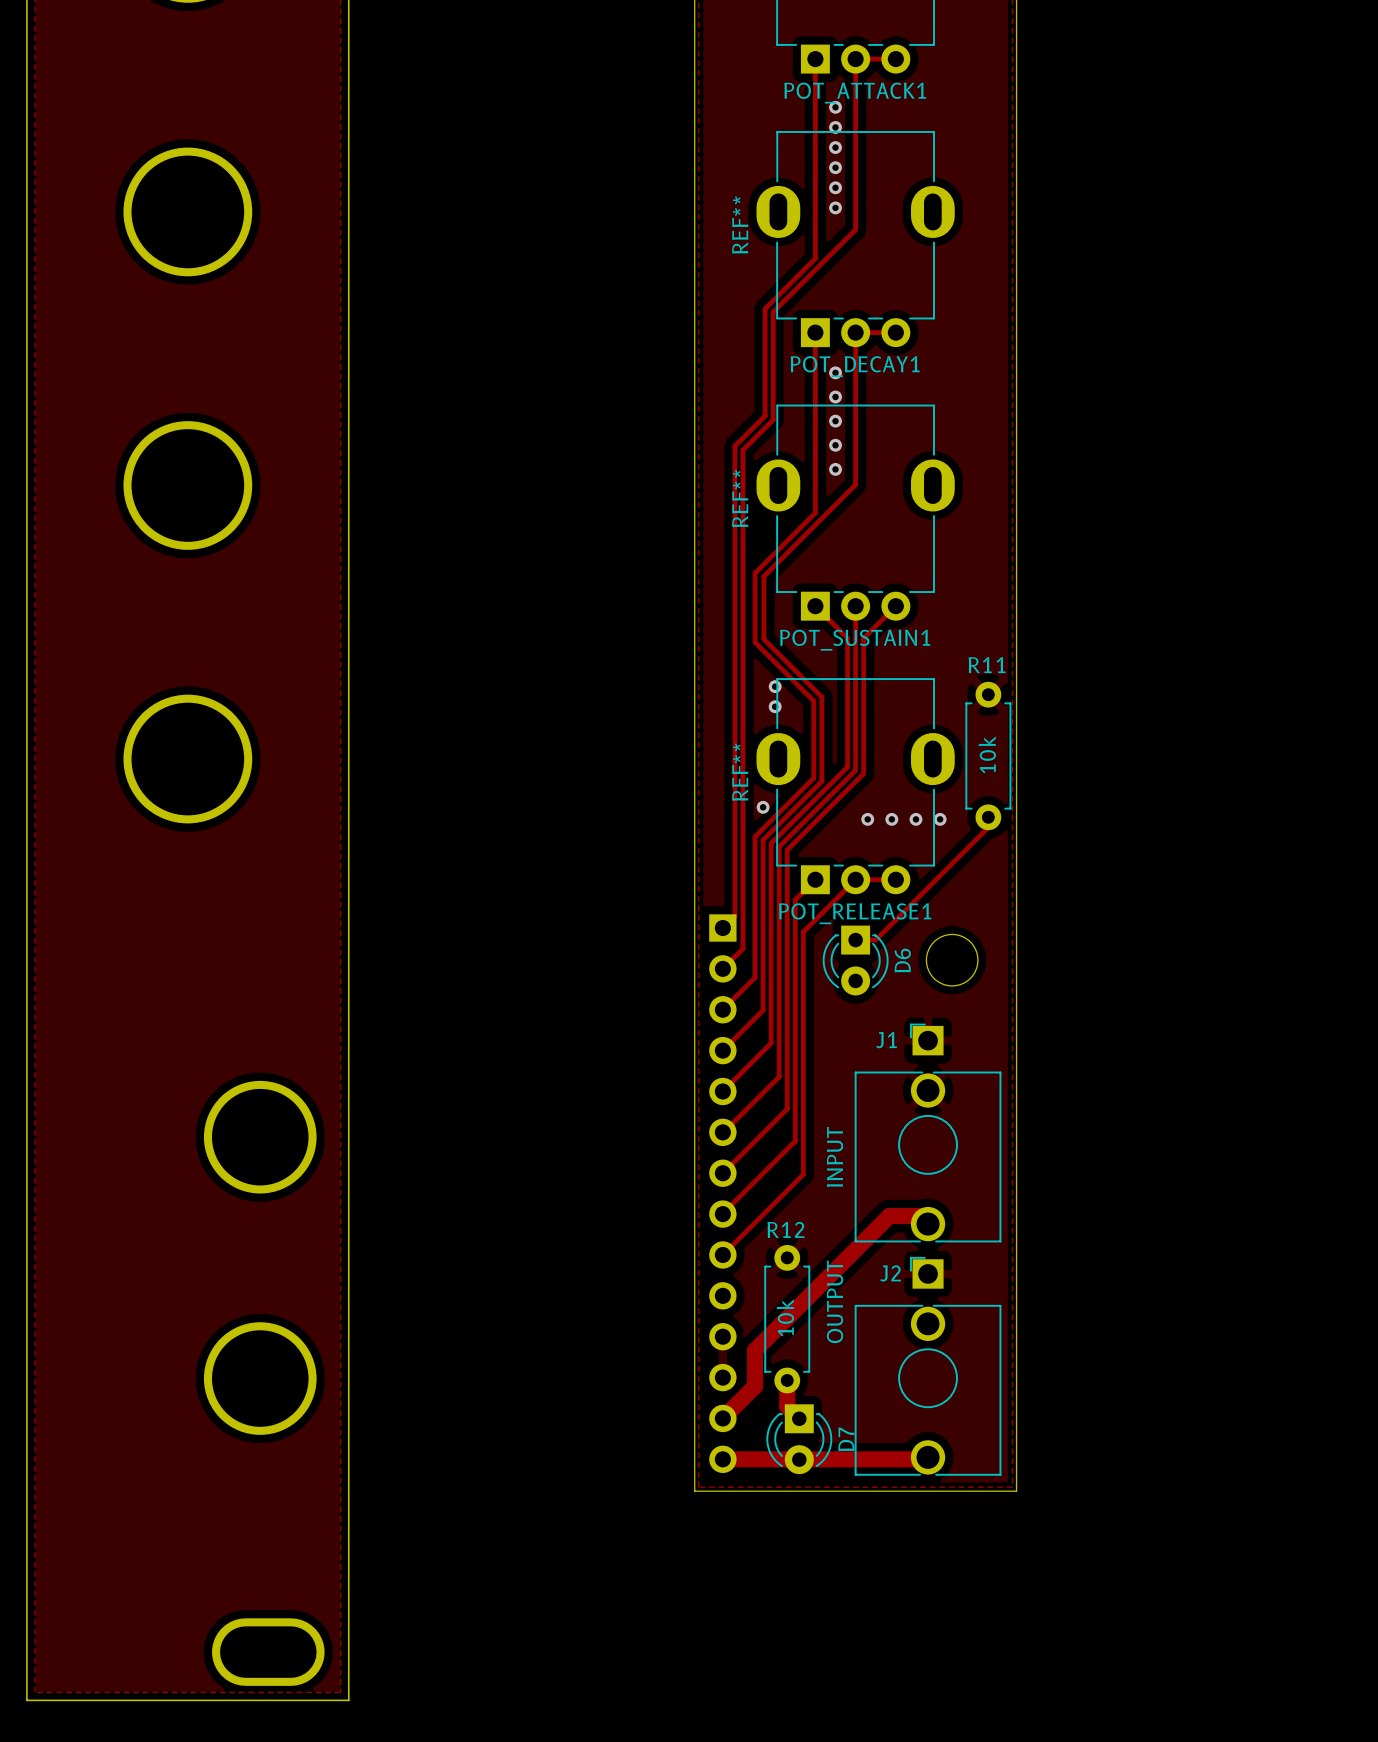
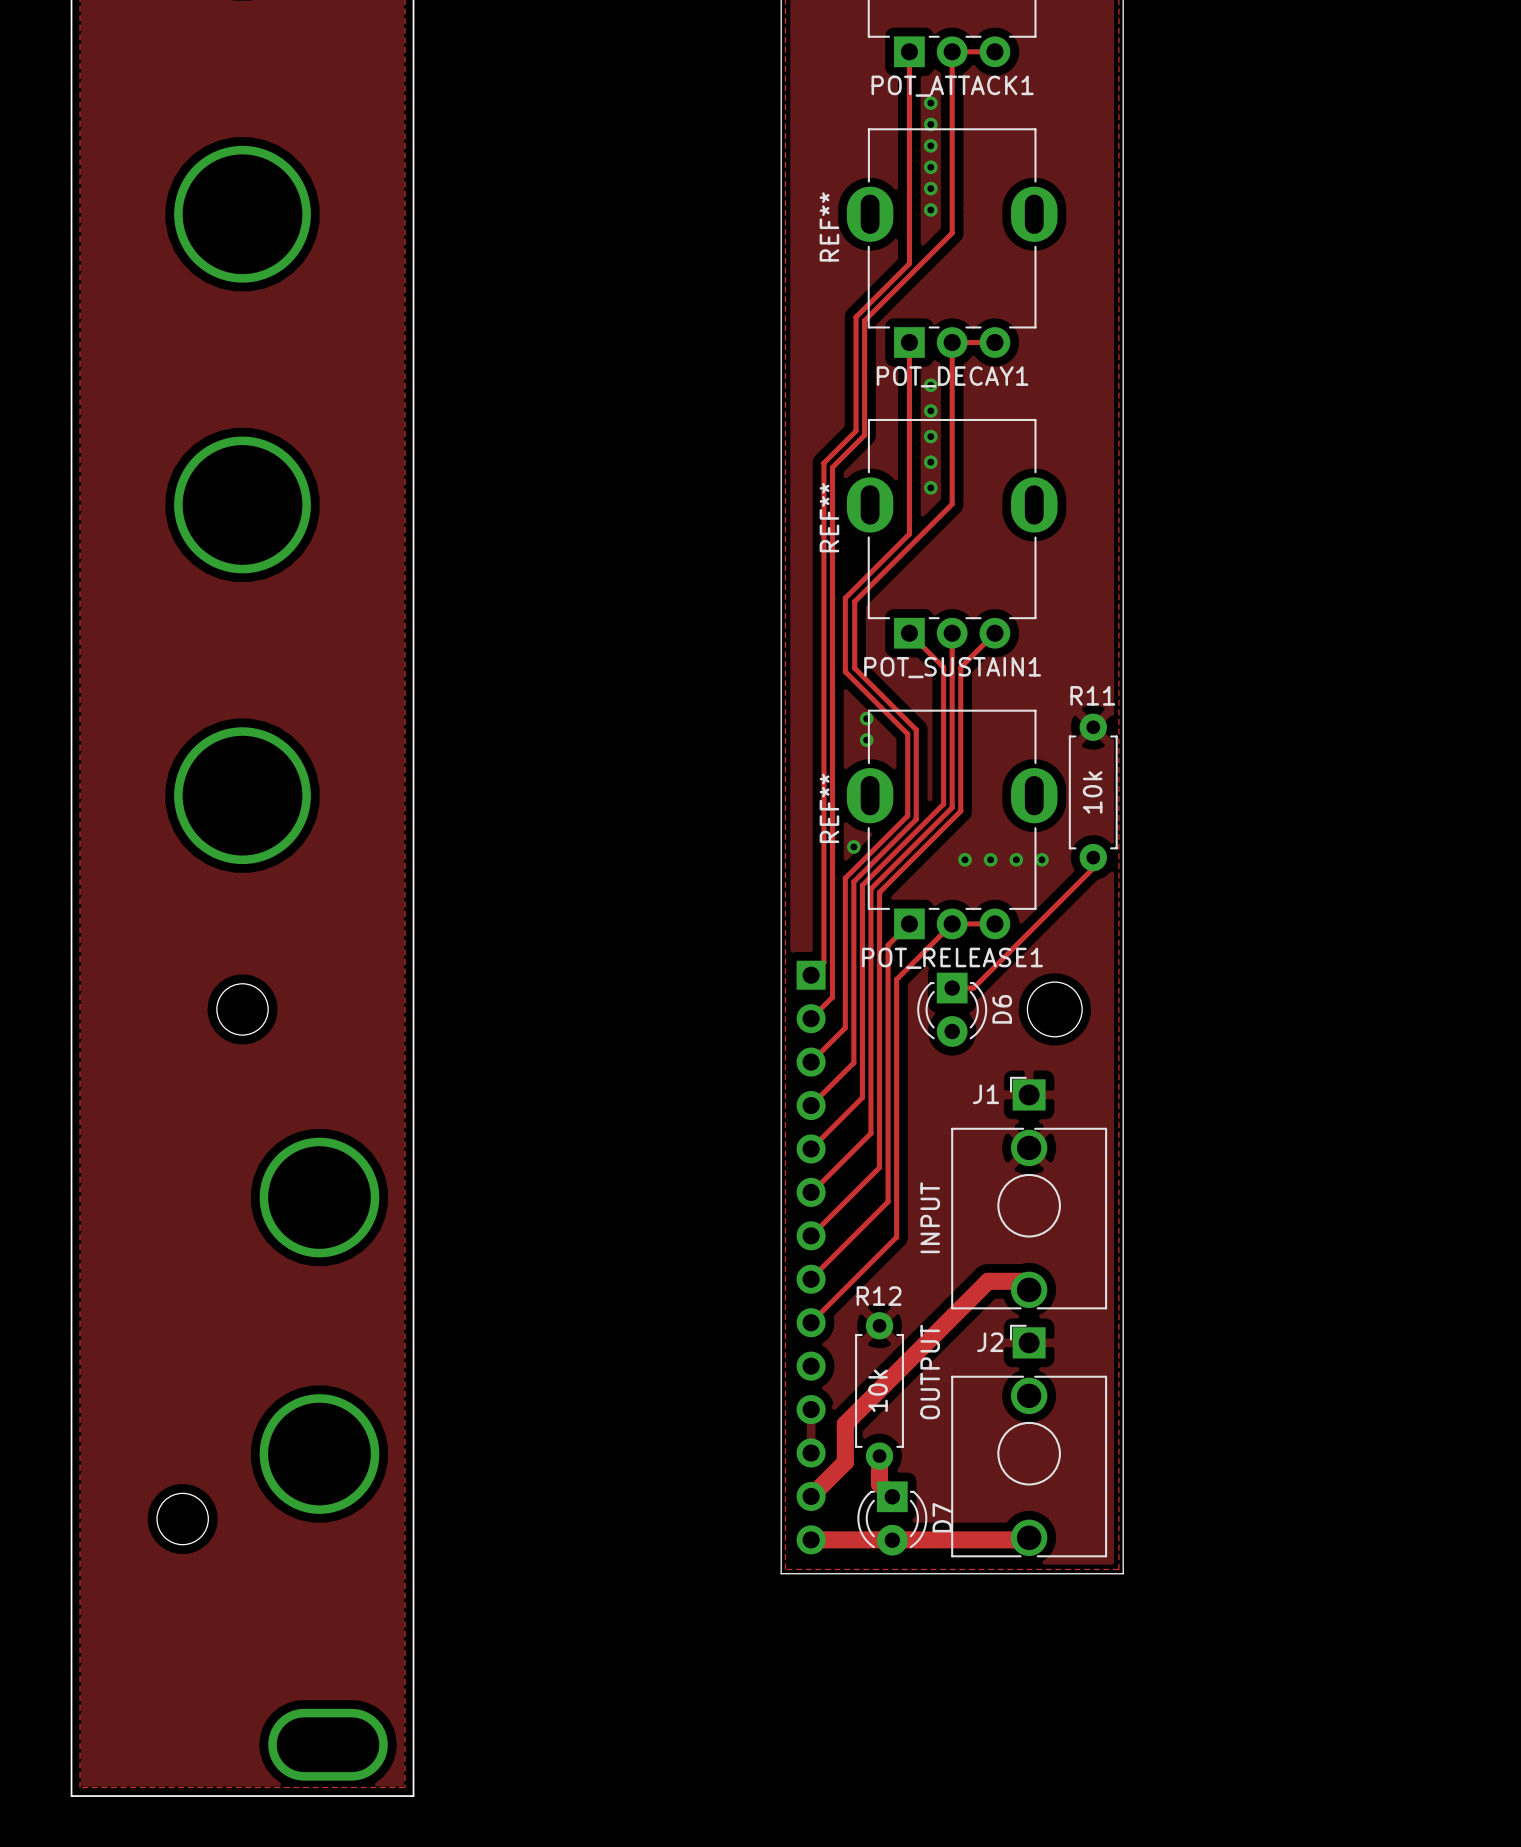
round board edge: none -> [216, 983, 269, 1036]
round board edge: none -> [156, 1492, 209, 1546]

